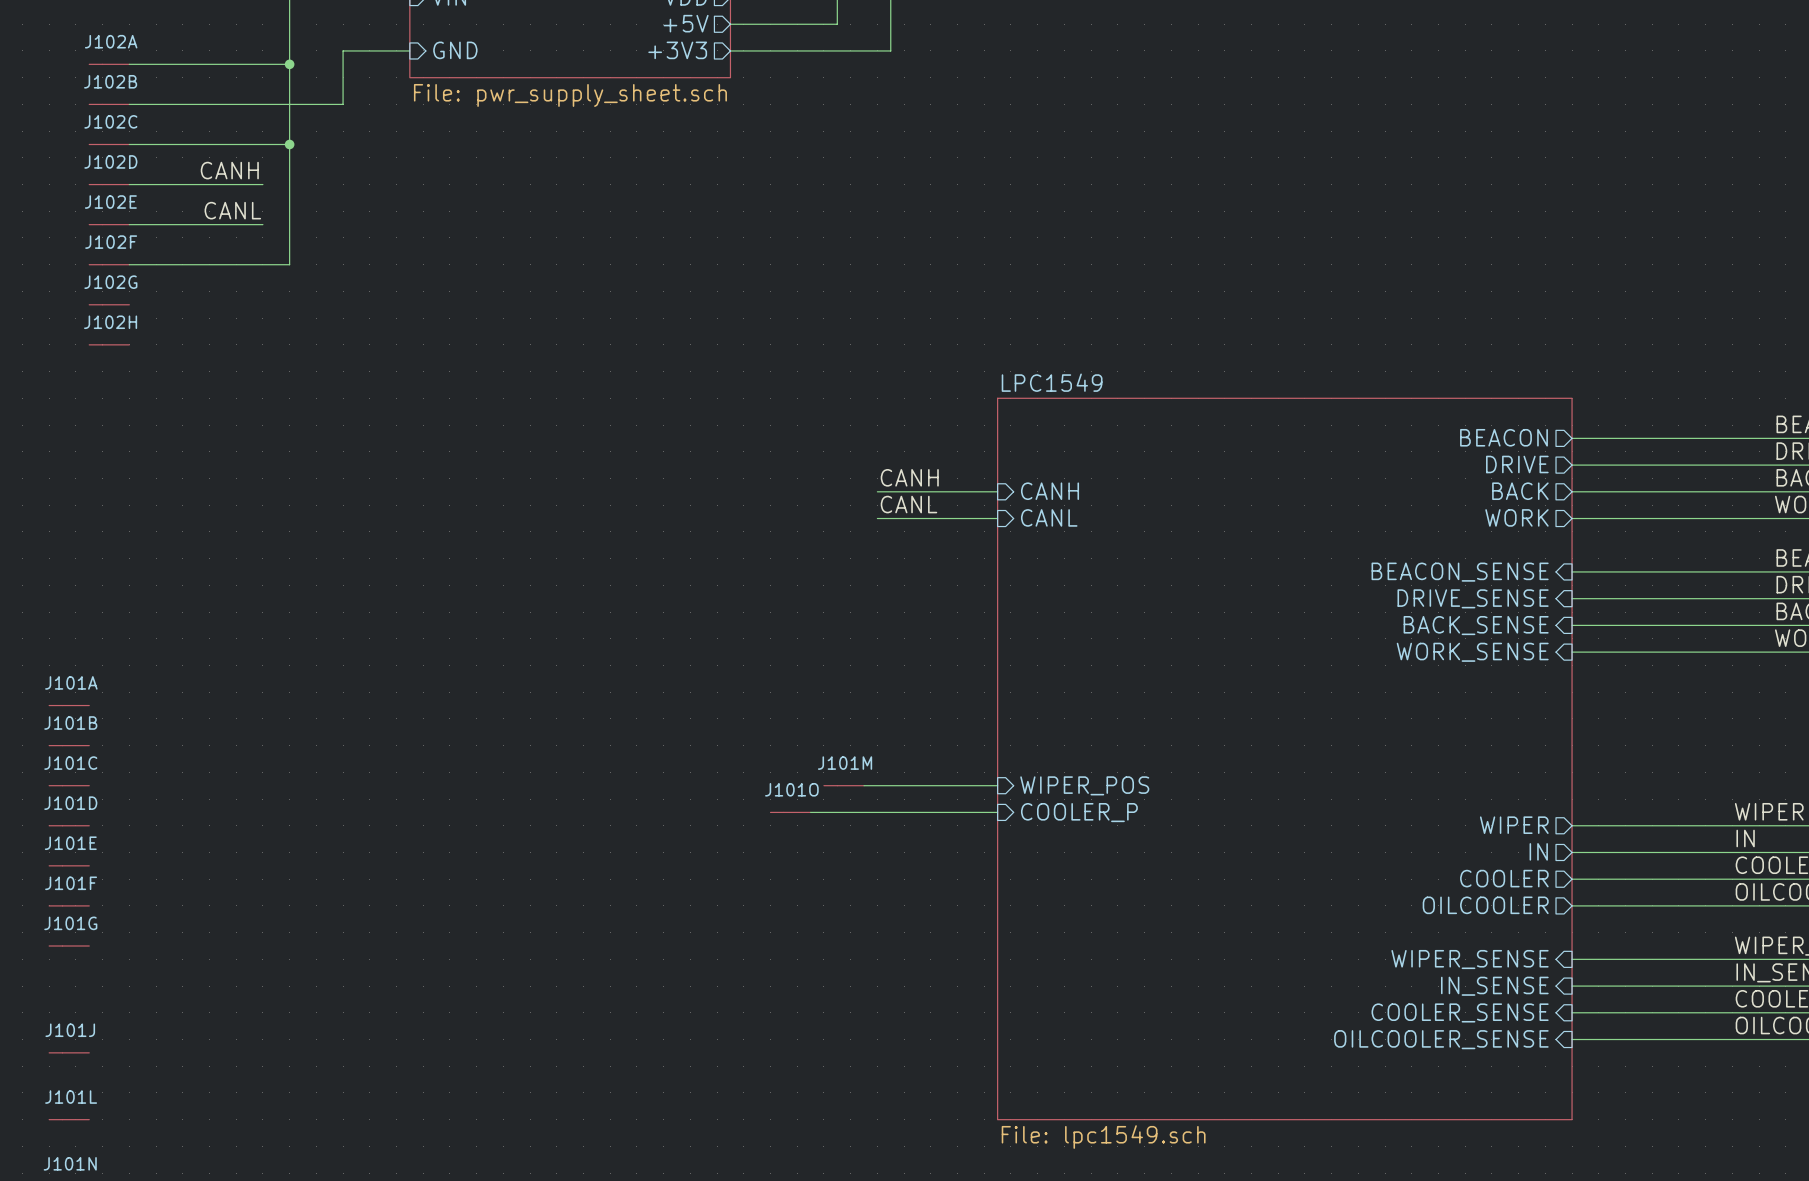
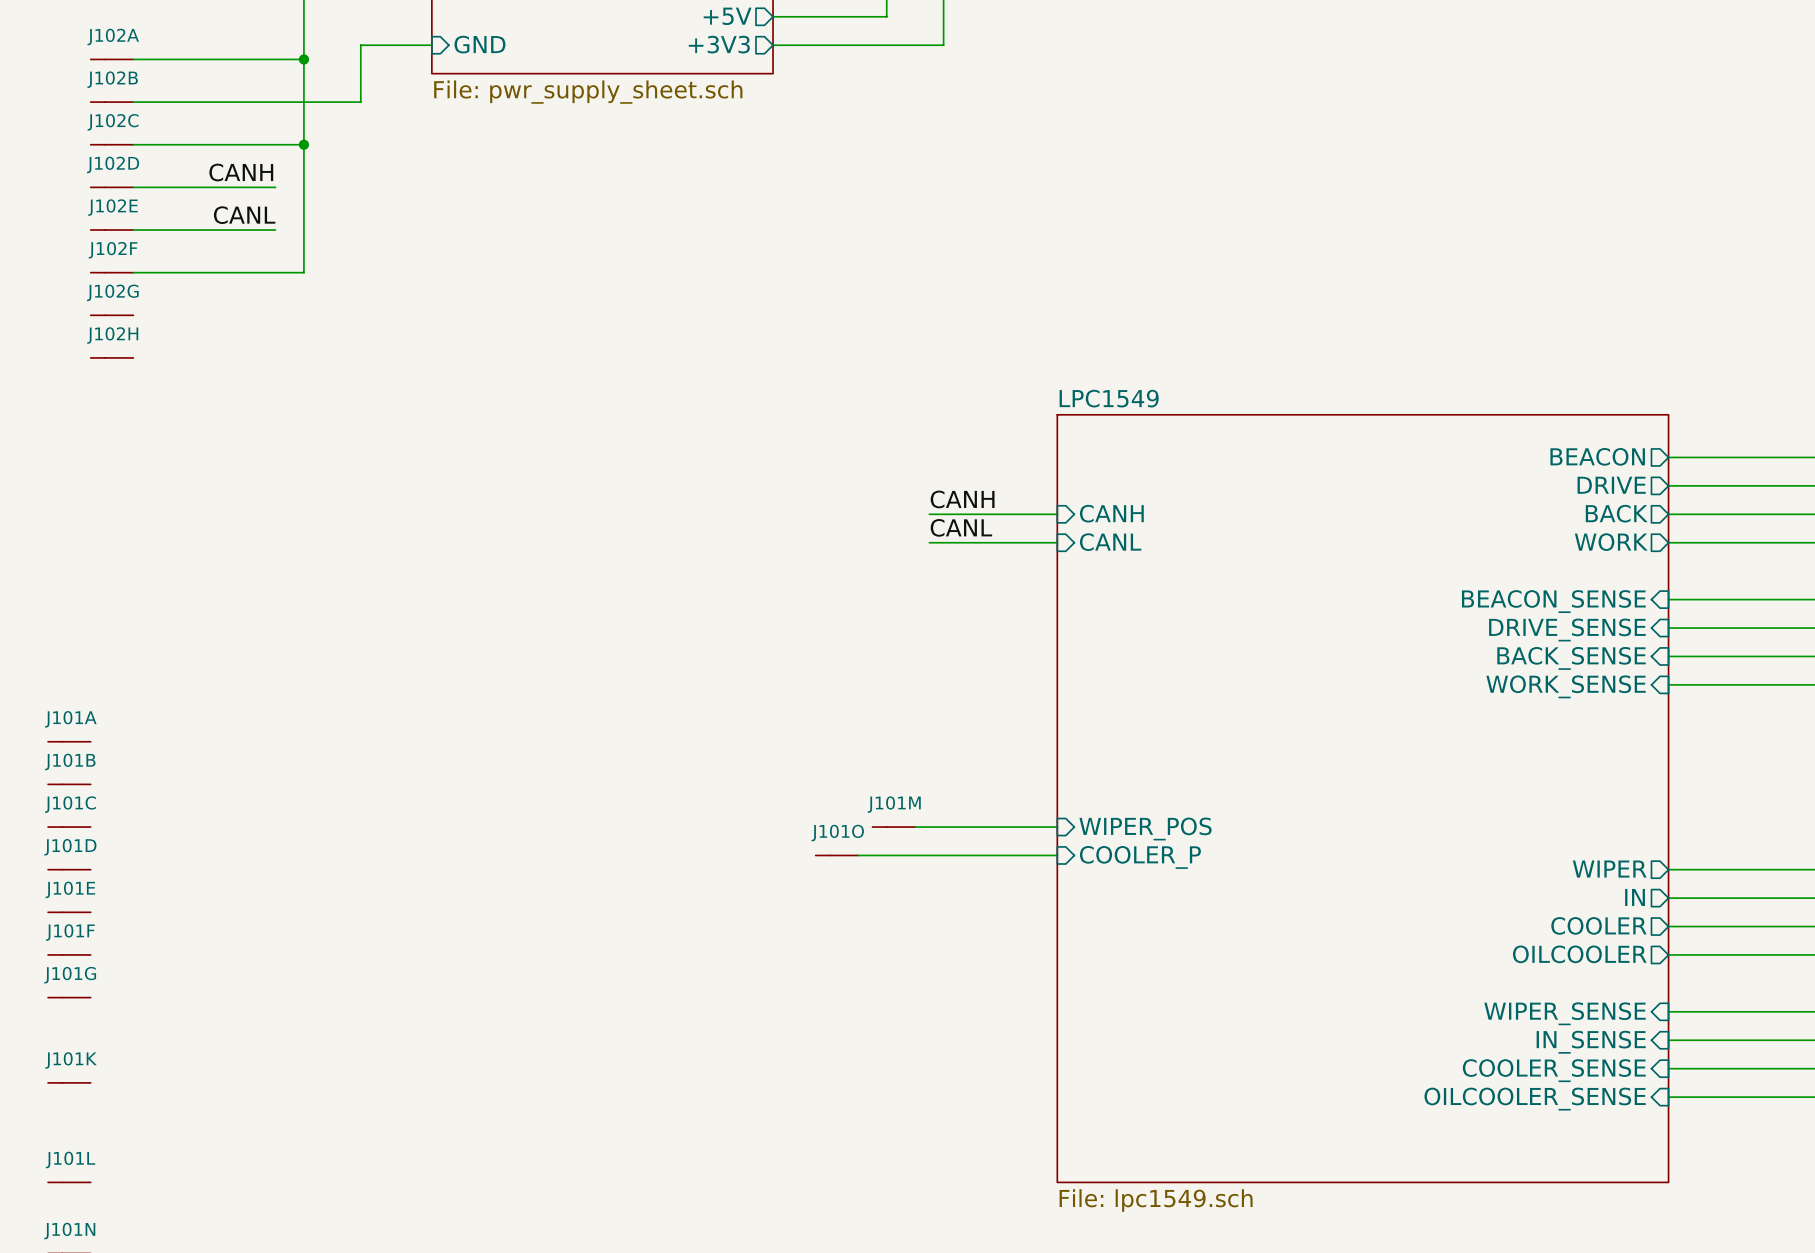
J101K: none -> (69, 1082)
J101J: (69, 1052) -> none

